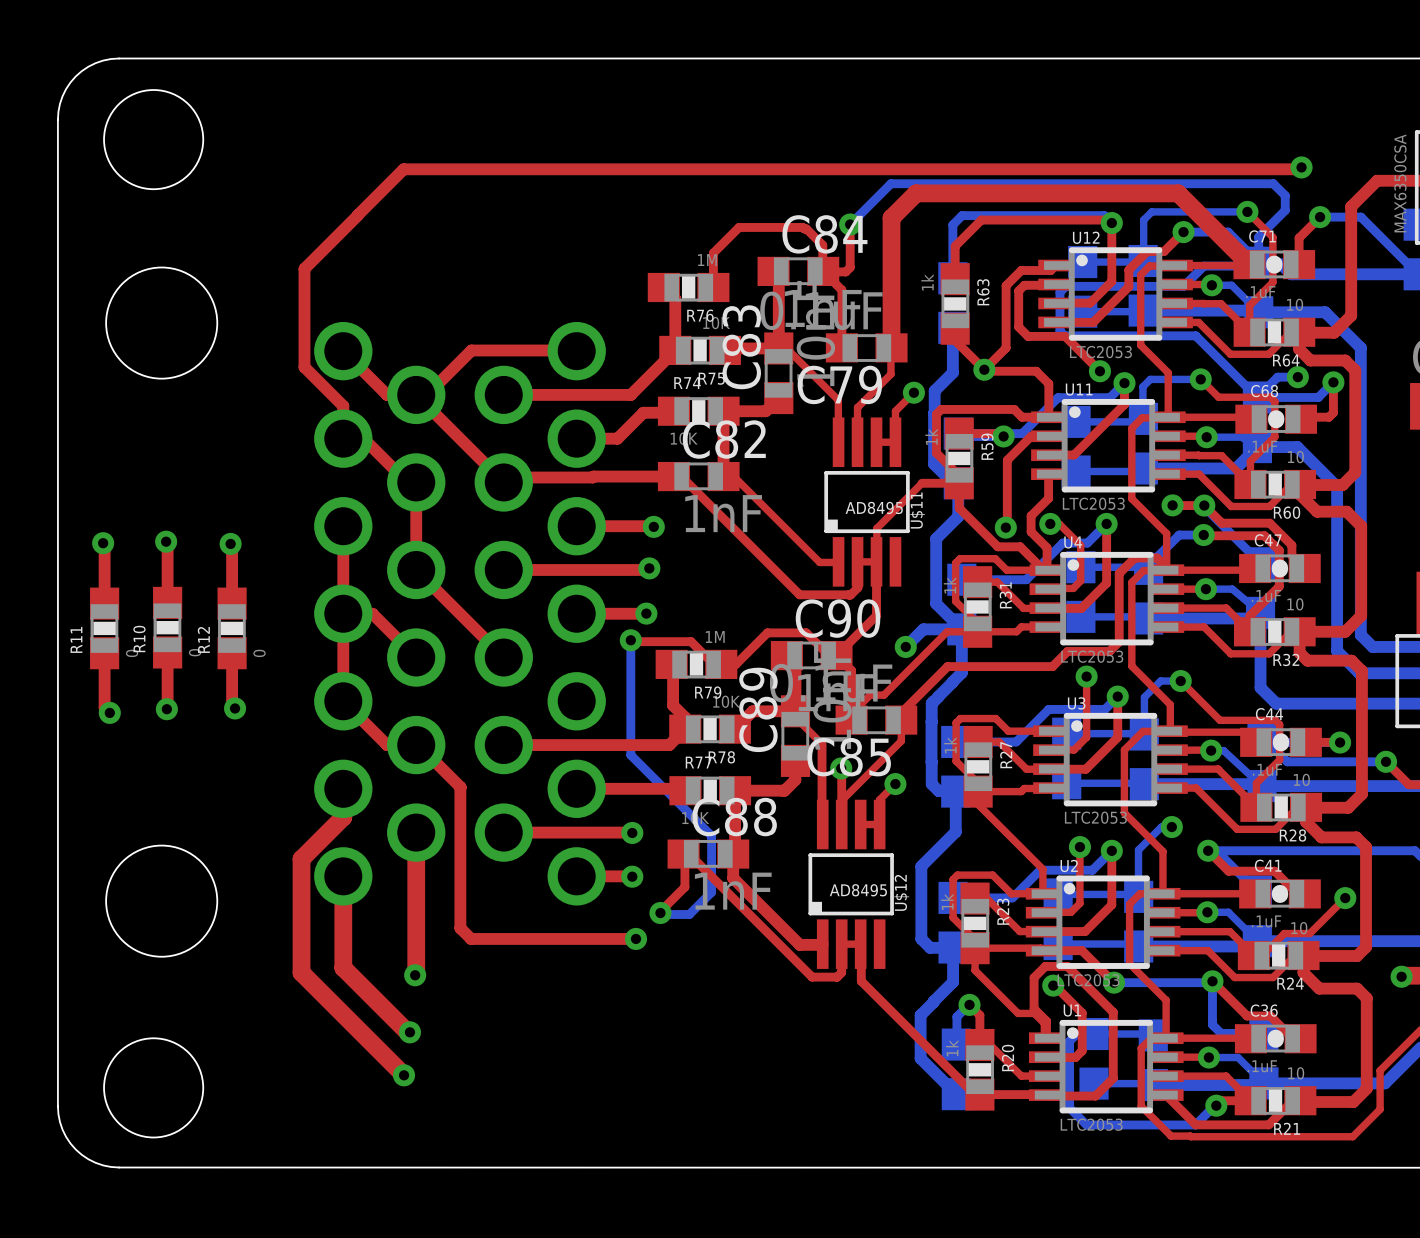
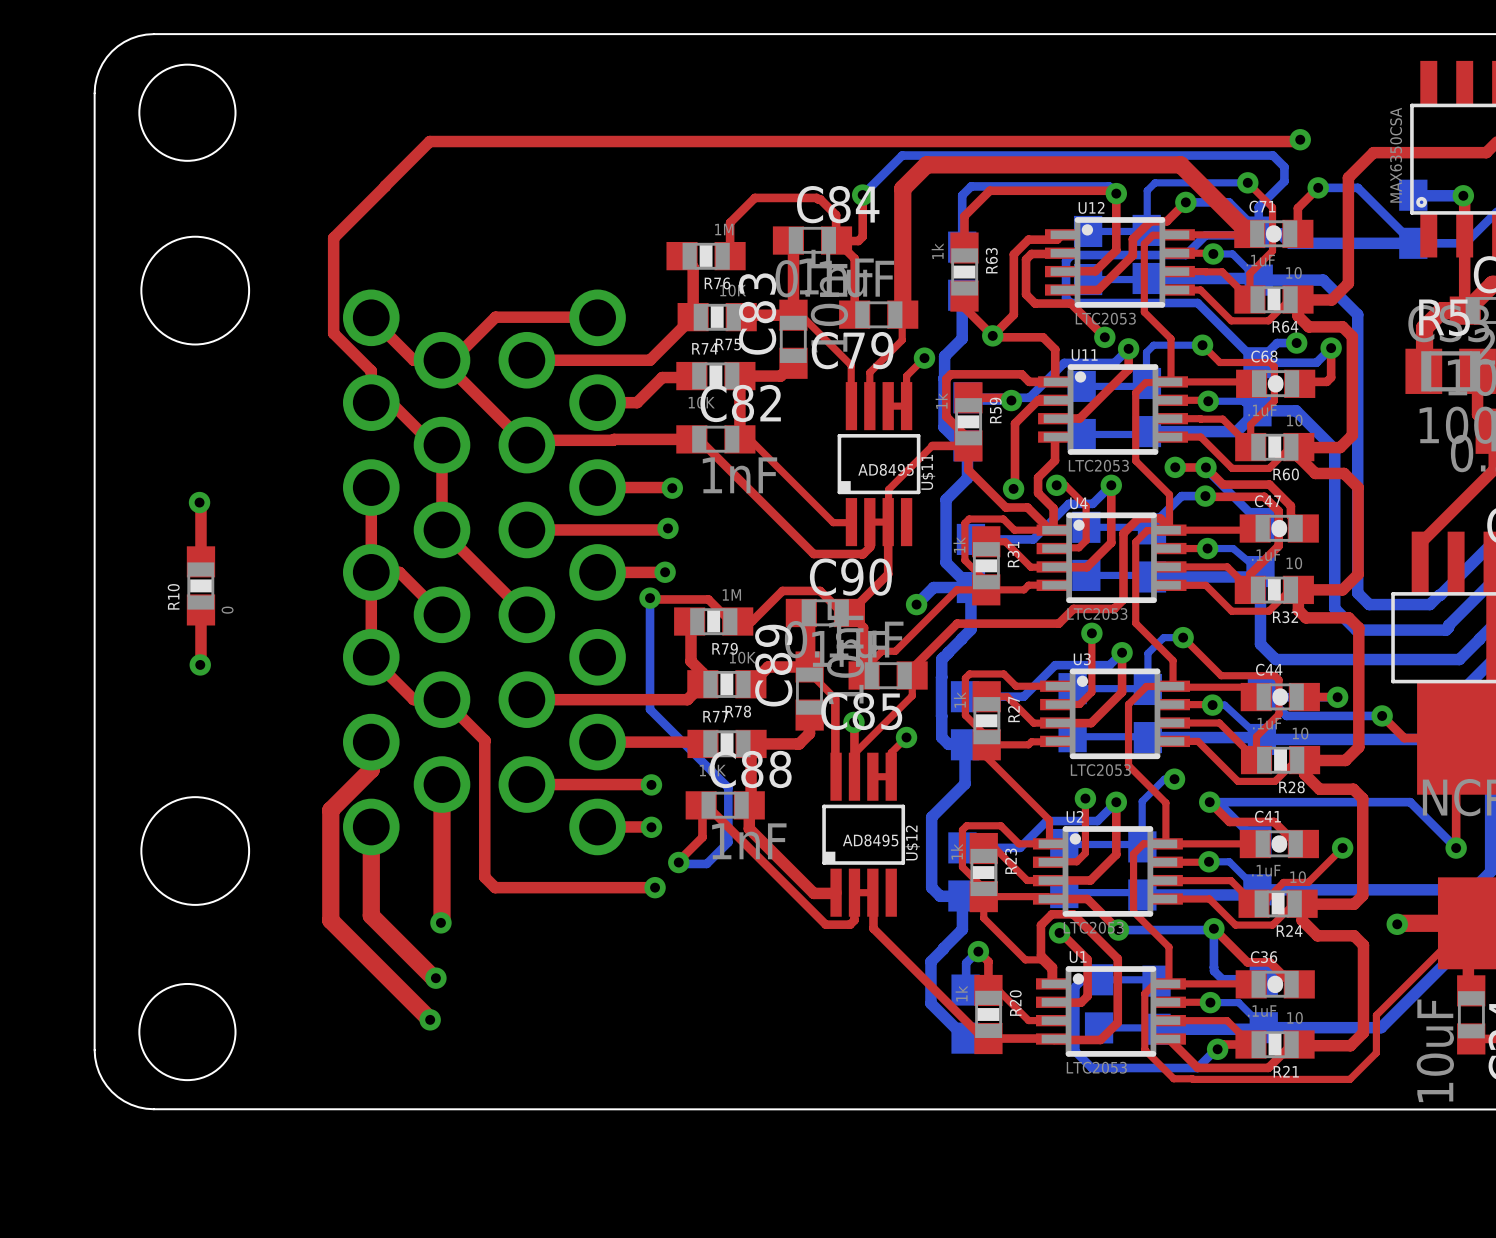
top track: (103, 543) (104, 603) -> none
via: (103, 543) -> none
top track: (230, 543) (232, 603) -> none
via: (230, 543) -> none
R11: 0 (104, 628) -> none
R12: 0 (232, 628) -> none
top track: (104, 653) (104, 707) (109, 712) -> none
top track: (232, 653) (232, 705) (235, 708) -> none
via: (235, 708) -> none
via: (109, 712) -> none

